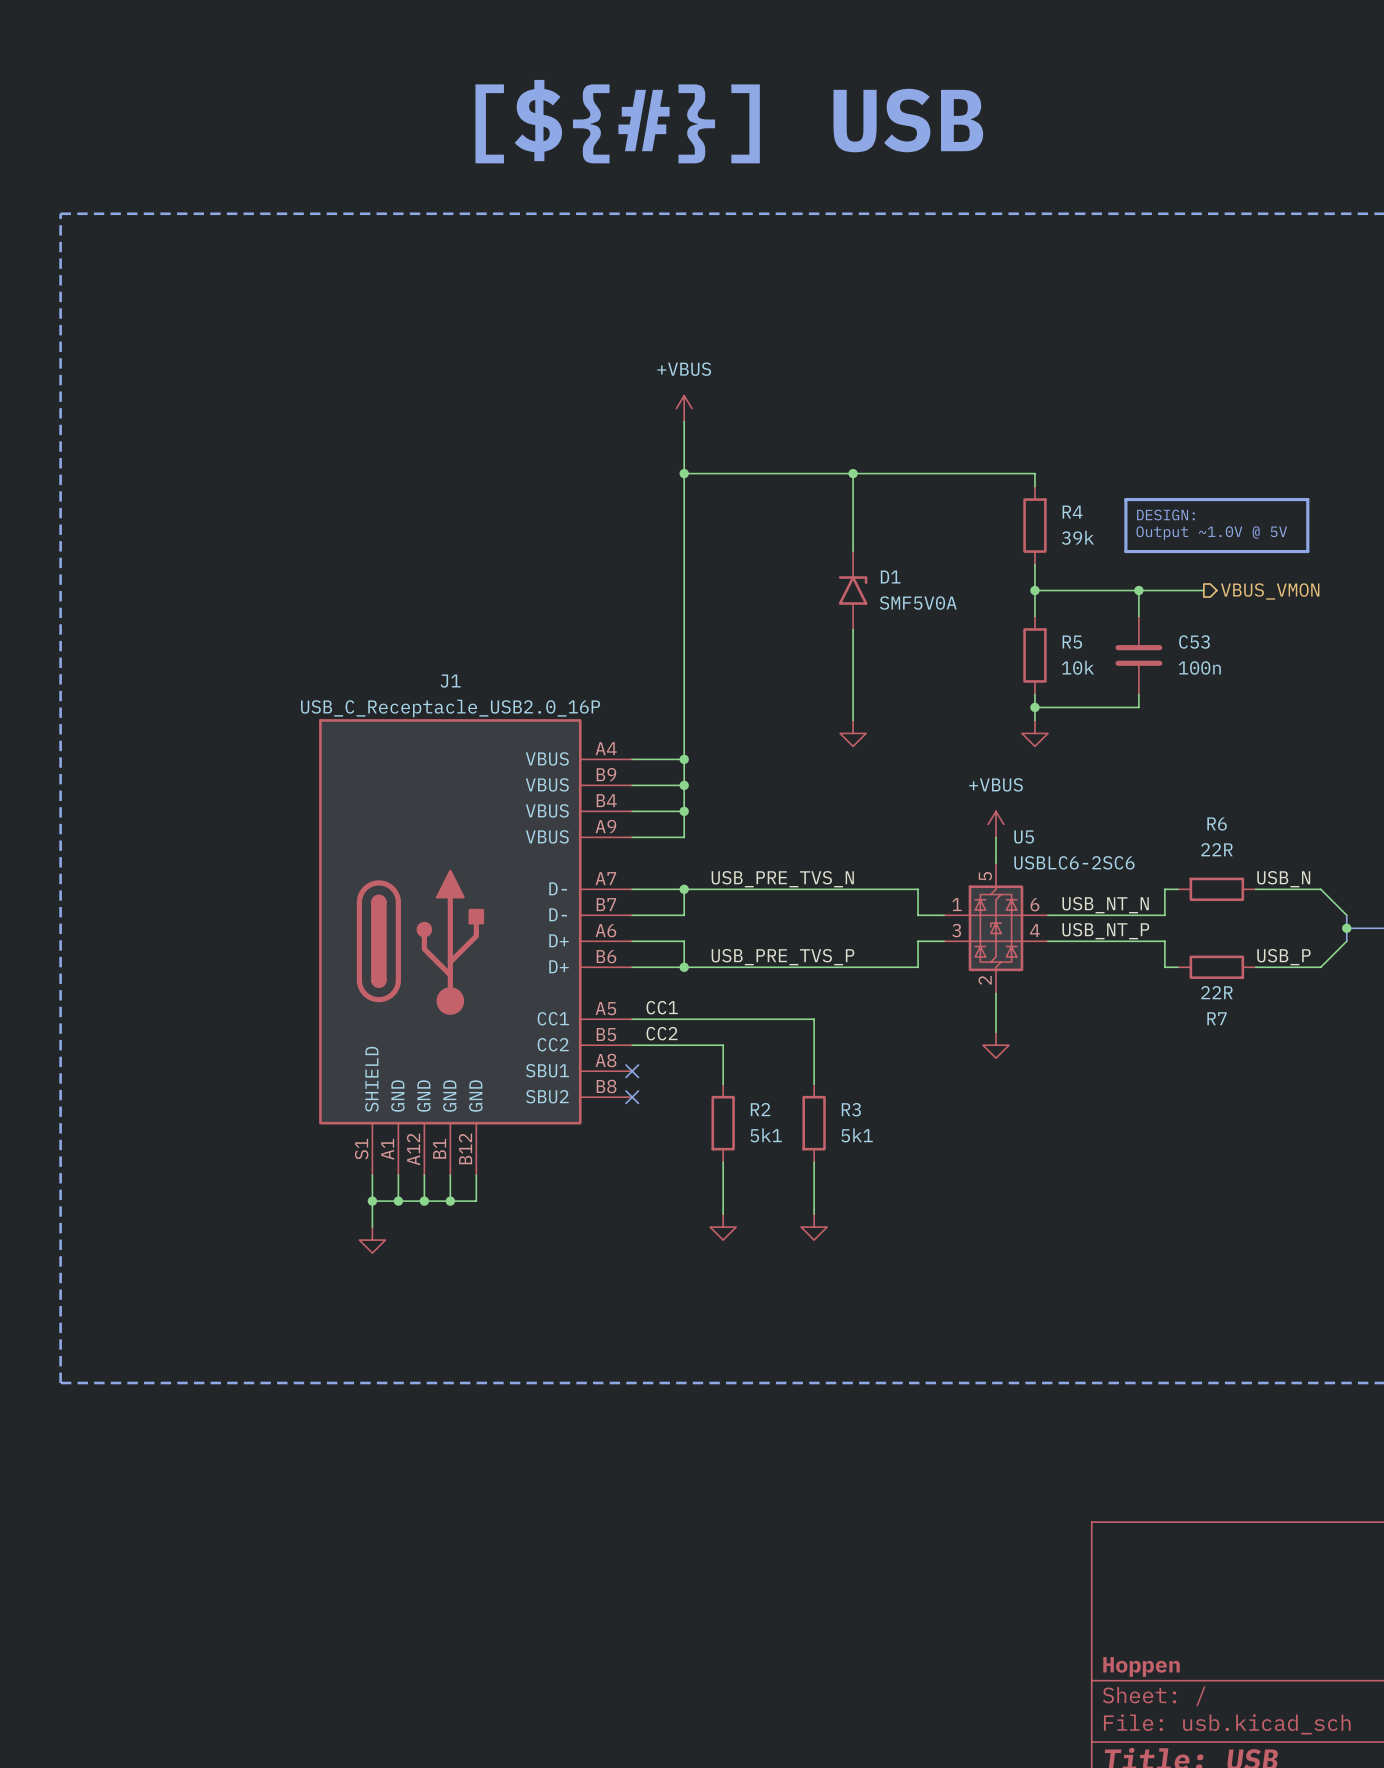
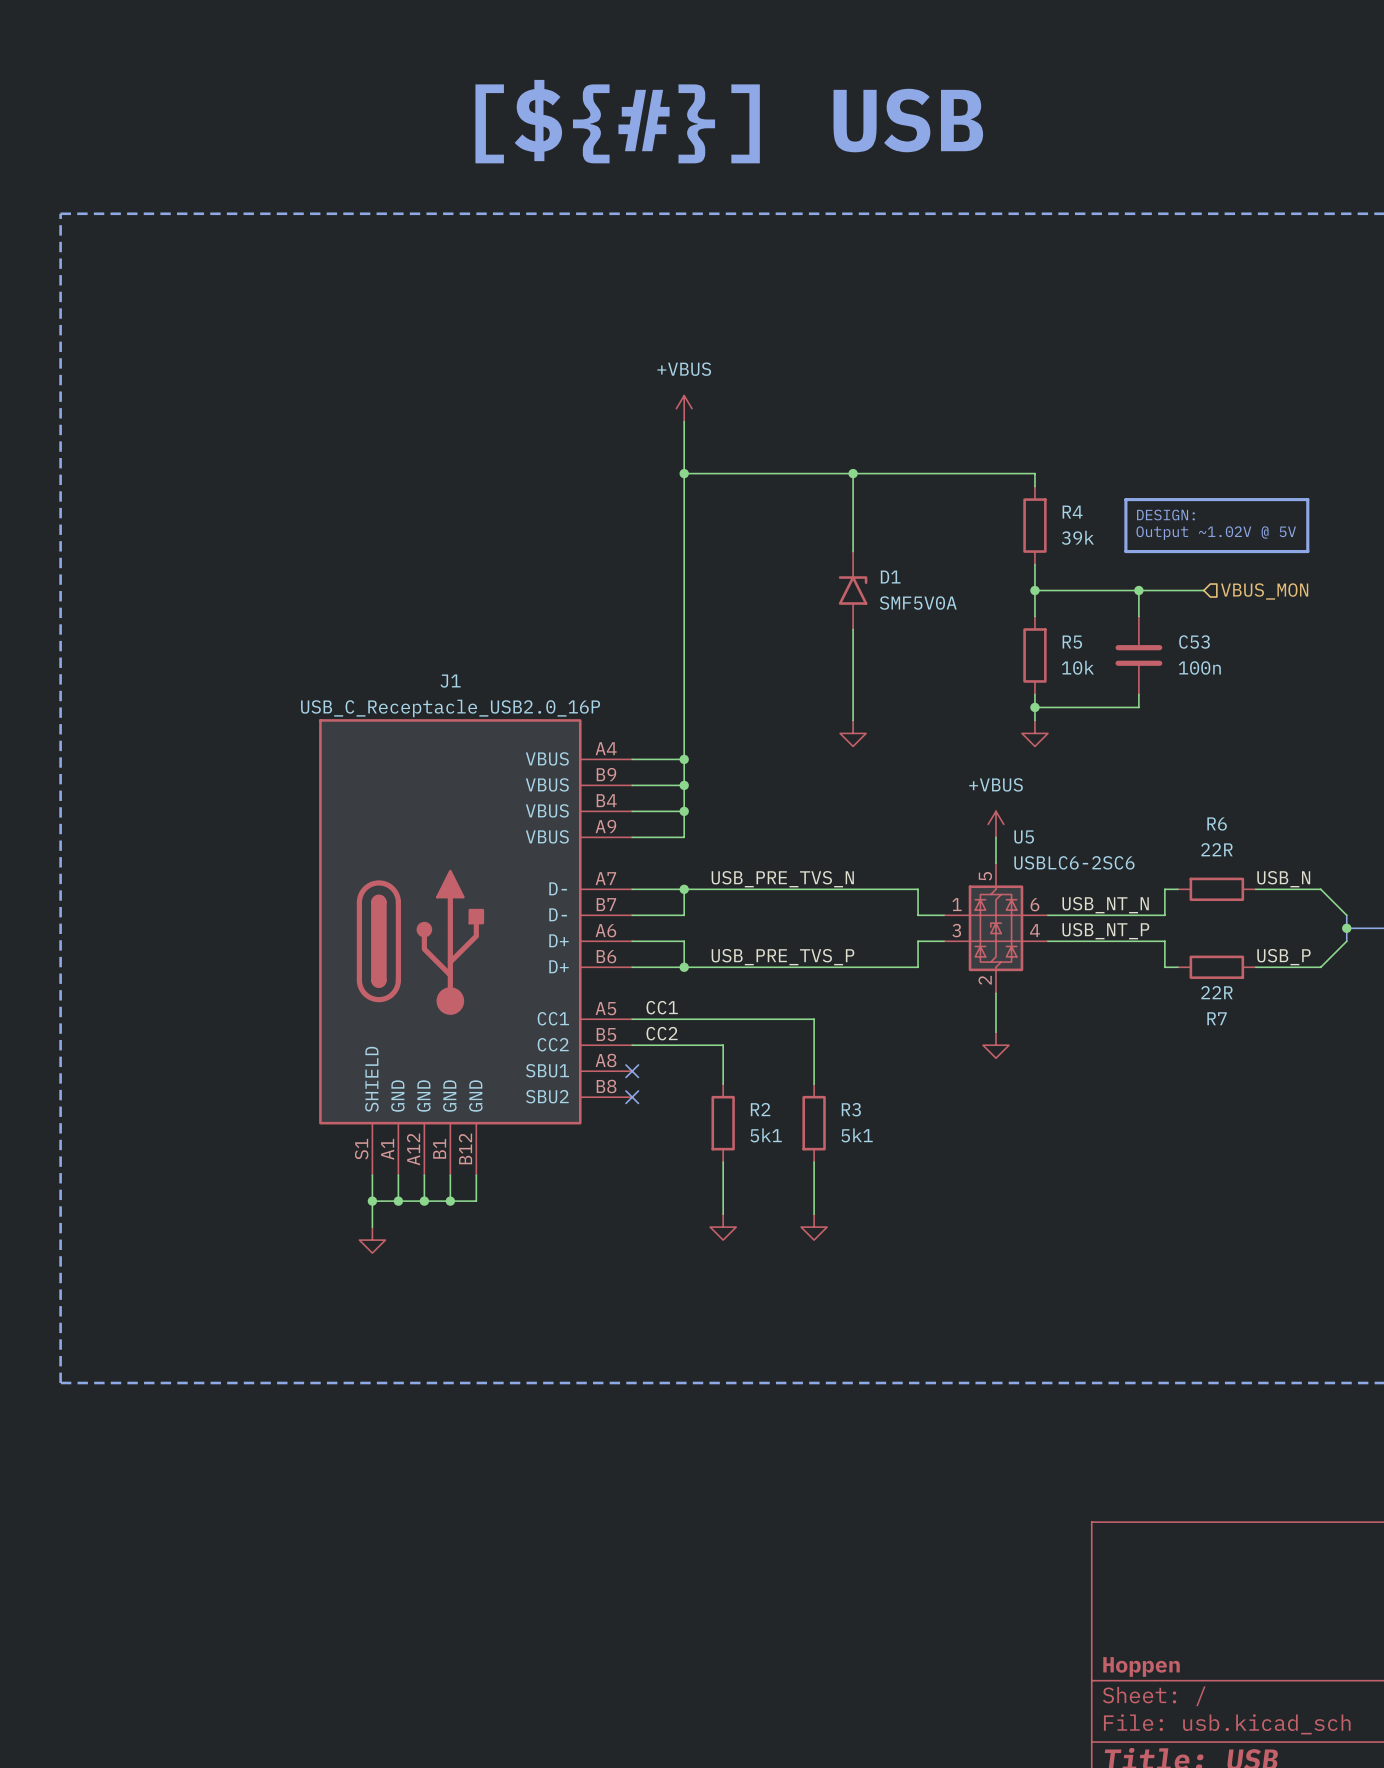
text: Output ~1.0V @ 5V (1211, 533) -> Output ~1.02V @ 5V (1216, 533)
hierarchical label shape: output (1270, 591) -> input (1264, 591)
hierarchical label: VBUS_VMON (1270, 591) -> VBUS_MON (1264, 591)

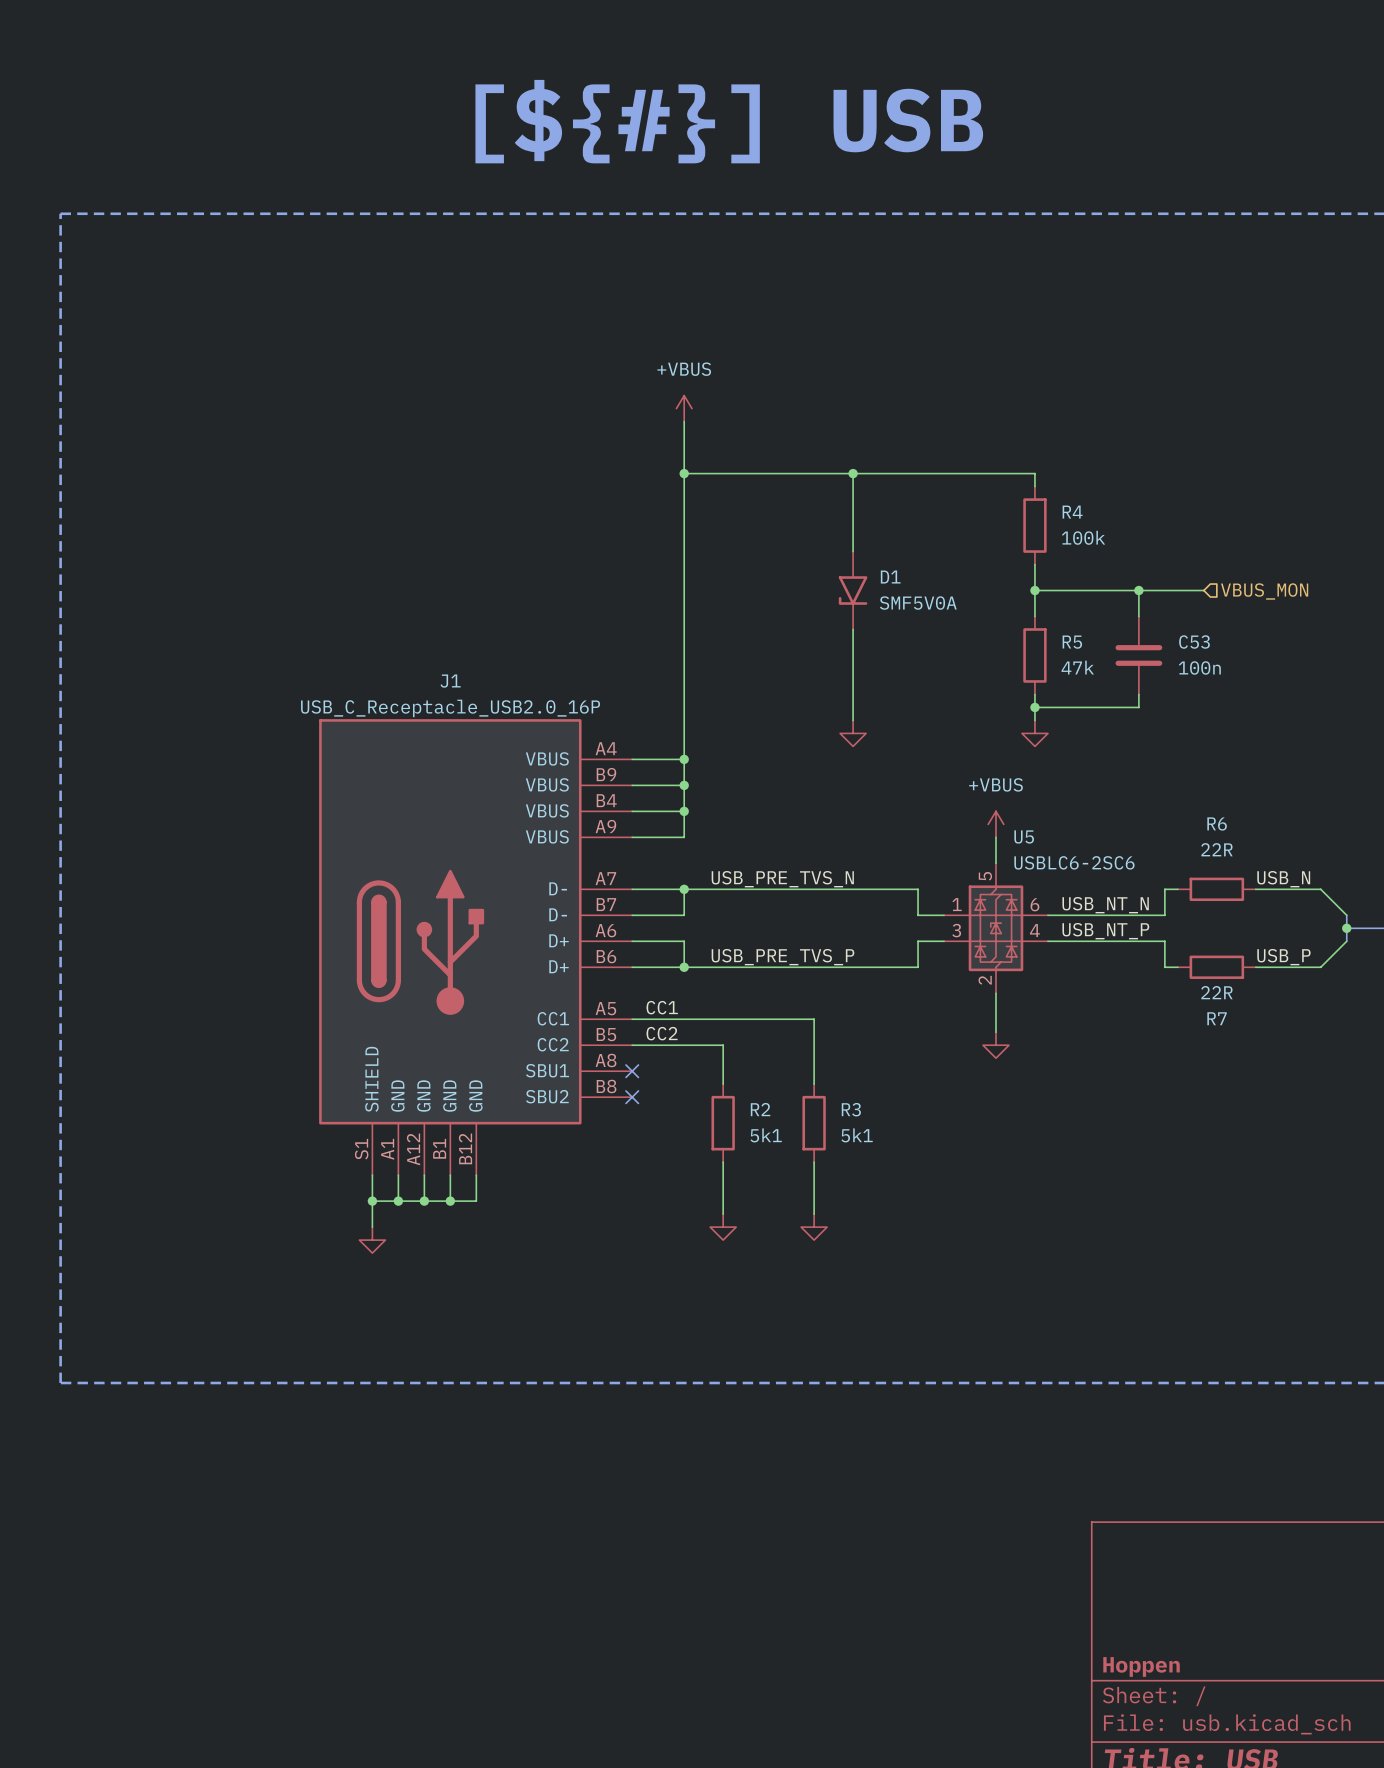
line: (1125, 499) (1307, 499) (1307, 551) (1125, 551) (1125, 499) -> none
text: DESIGN: (1165, 515) -> none
text: Output ~1.02V @ 5V (1216, 533) -> none
R4 value: 39k (1077, 537) -> 100k (1083, 537)
D1 rotation: 0° (853, 590) -> 180° (853, 590)
R5 value: 10k (1077, 667) -> 47k (1077, 667)

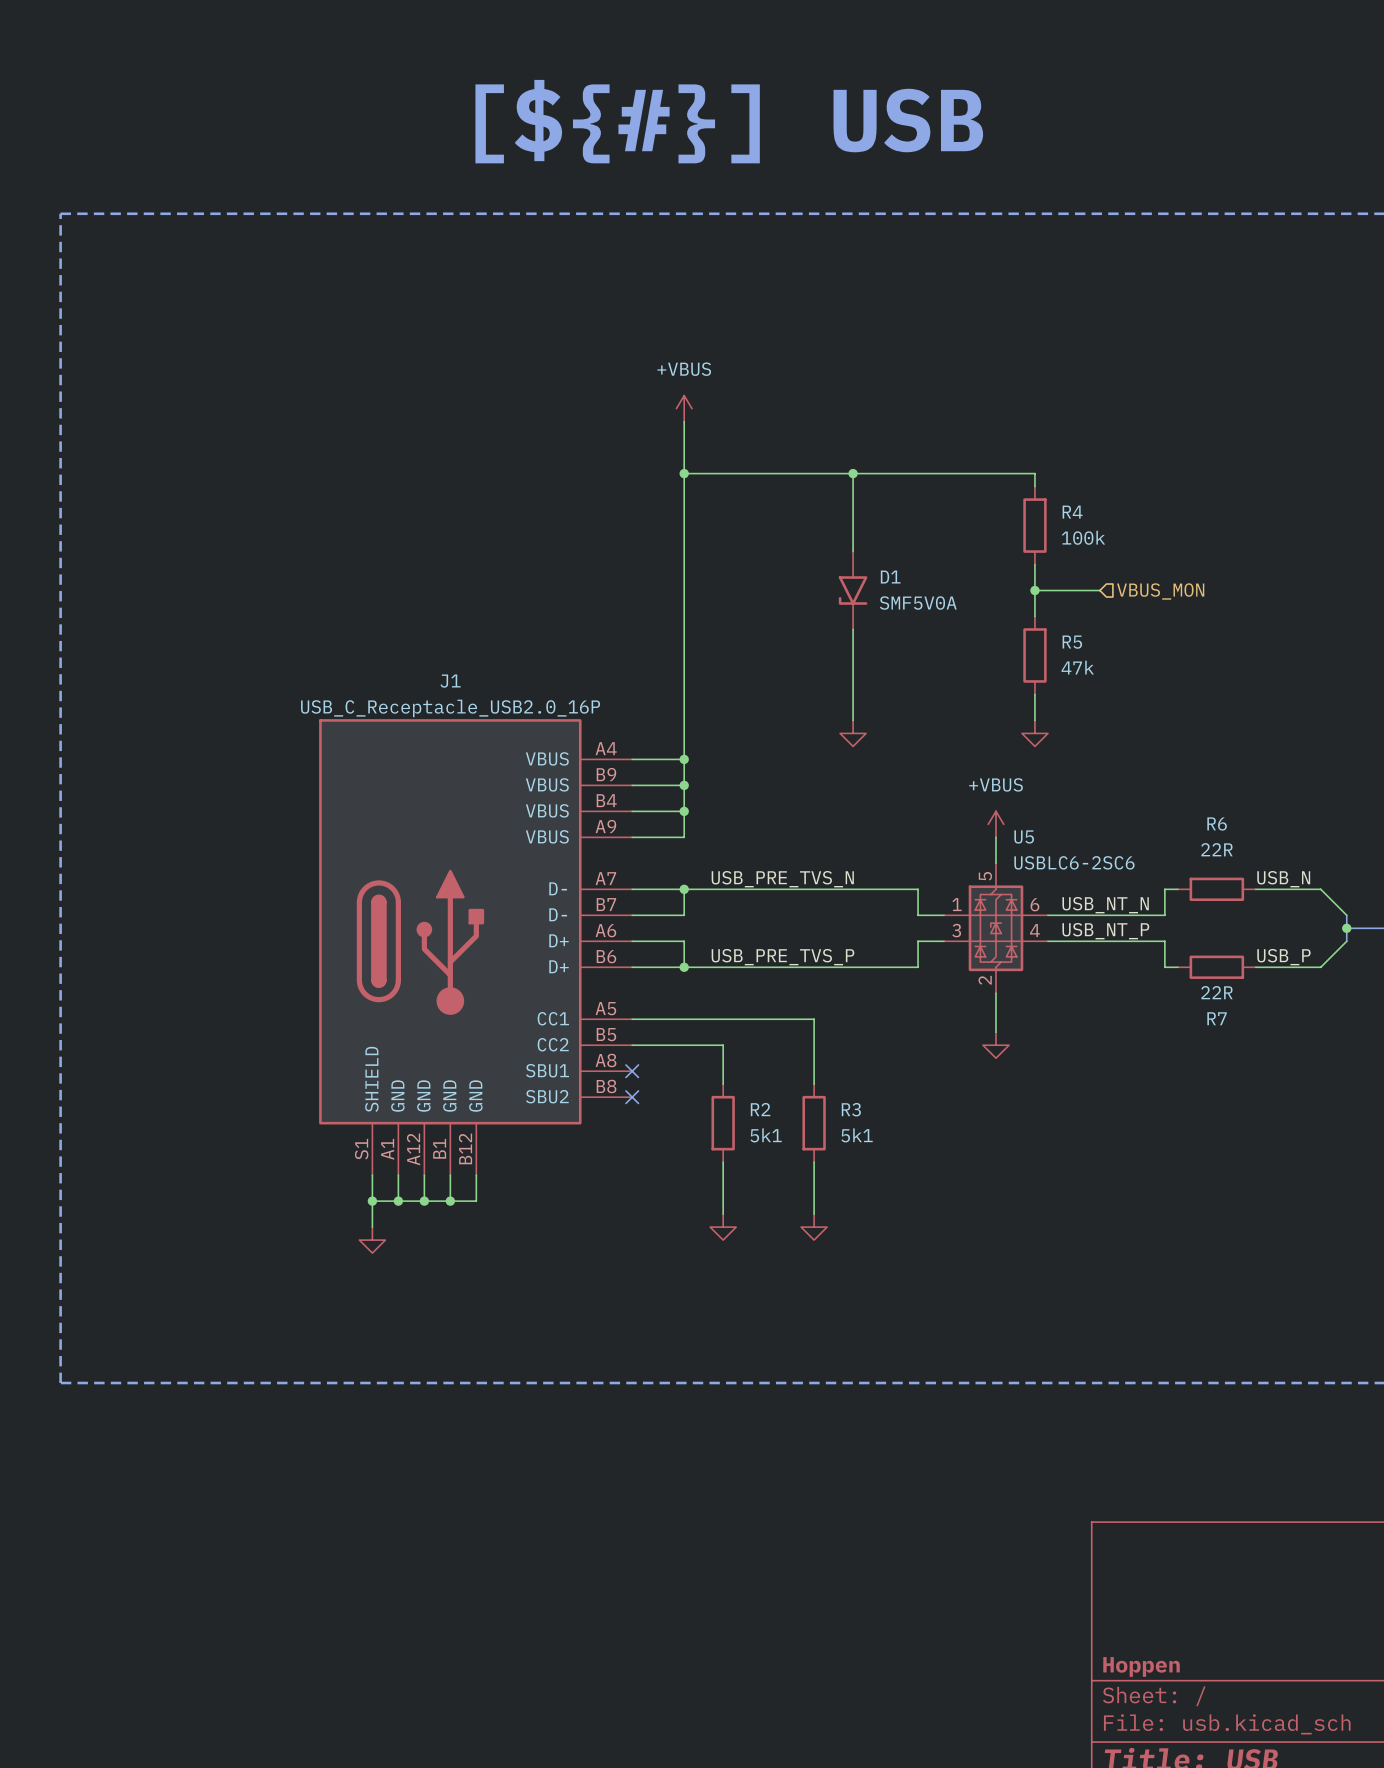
wire: (1099, 590) (1203, 590) -> none
wire: (1138, 590) (1138, 616) -> none
junction: (1138, 590) -> none
hierarchical label position: VBUS_MON (1264, 591) -> VBUS_MON (1160, 591)
C53: 100n (1138, 655) -> none
wire: (1138, 694) (1138, 707) (1034, 707) -> none
junction: (1034, 707) -> none
label: CC1 (662, 1007) -> none
label: CC2 (662, 1033) -> none

